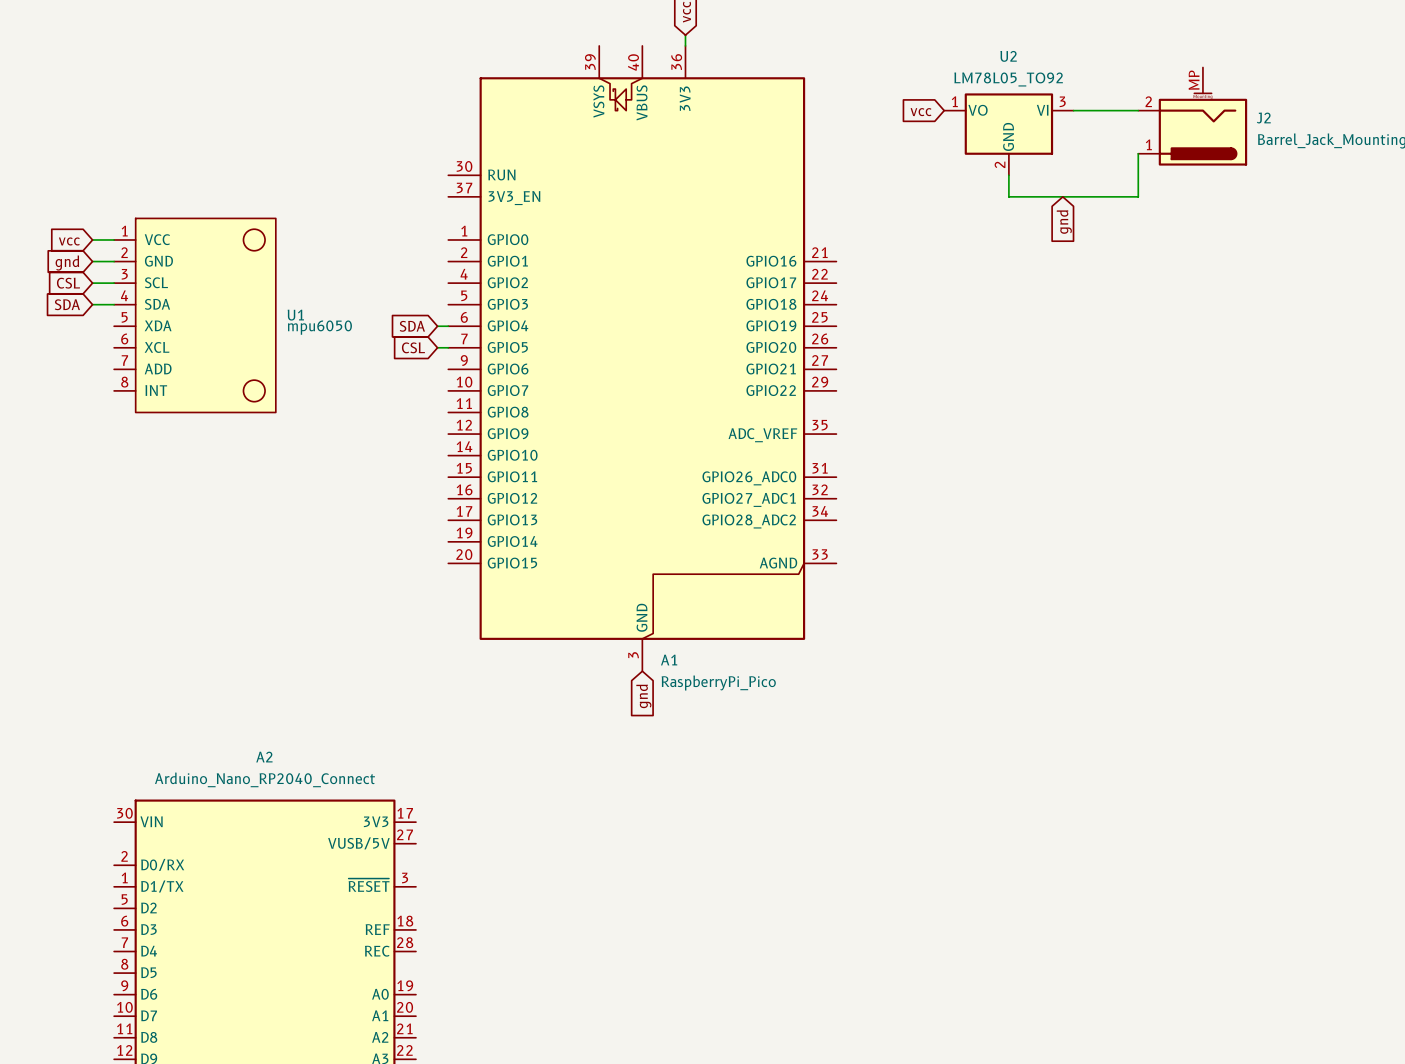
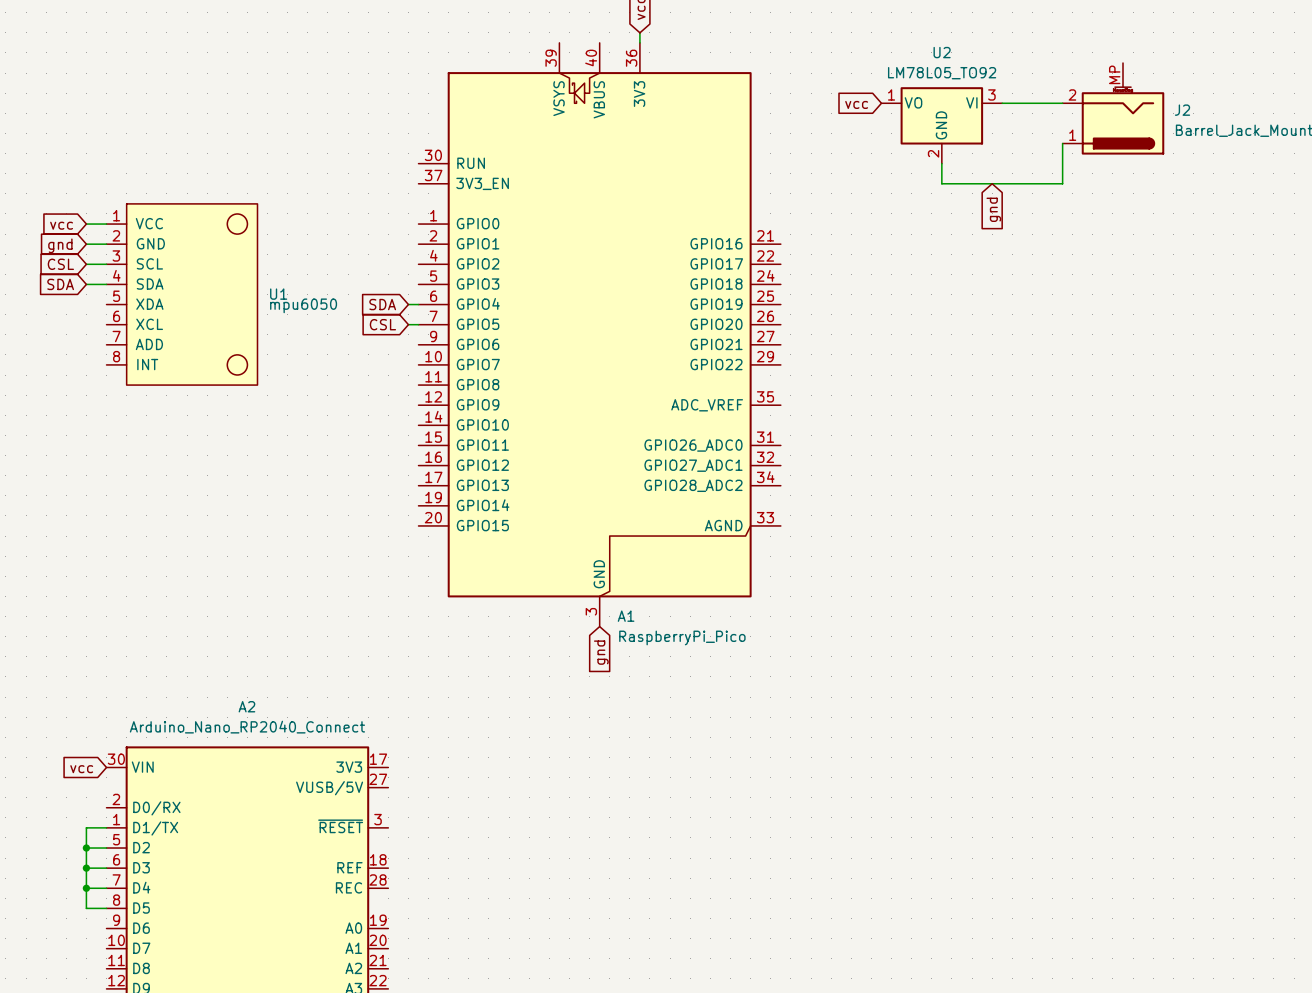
global label: none -> vcc (81, 769)
wire: none -> (106, 827) (86, 827) (86, 908) (106, 908)
wire: none -> (86, 848) (106, 848)
junction: none -> (86, 848)
wire: none -> (86, 868) (106, 868)
junction: none -> (86, 868)
wire: none -> (86, 888) (106, 888)
junction: none -> (86, 888)

